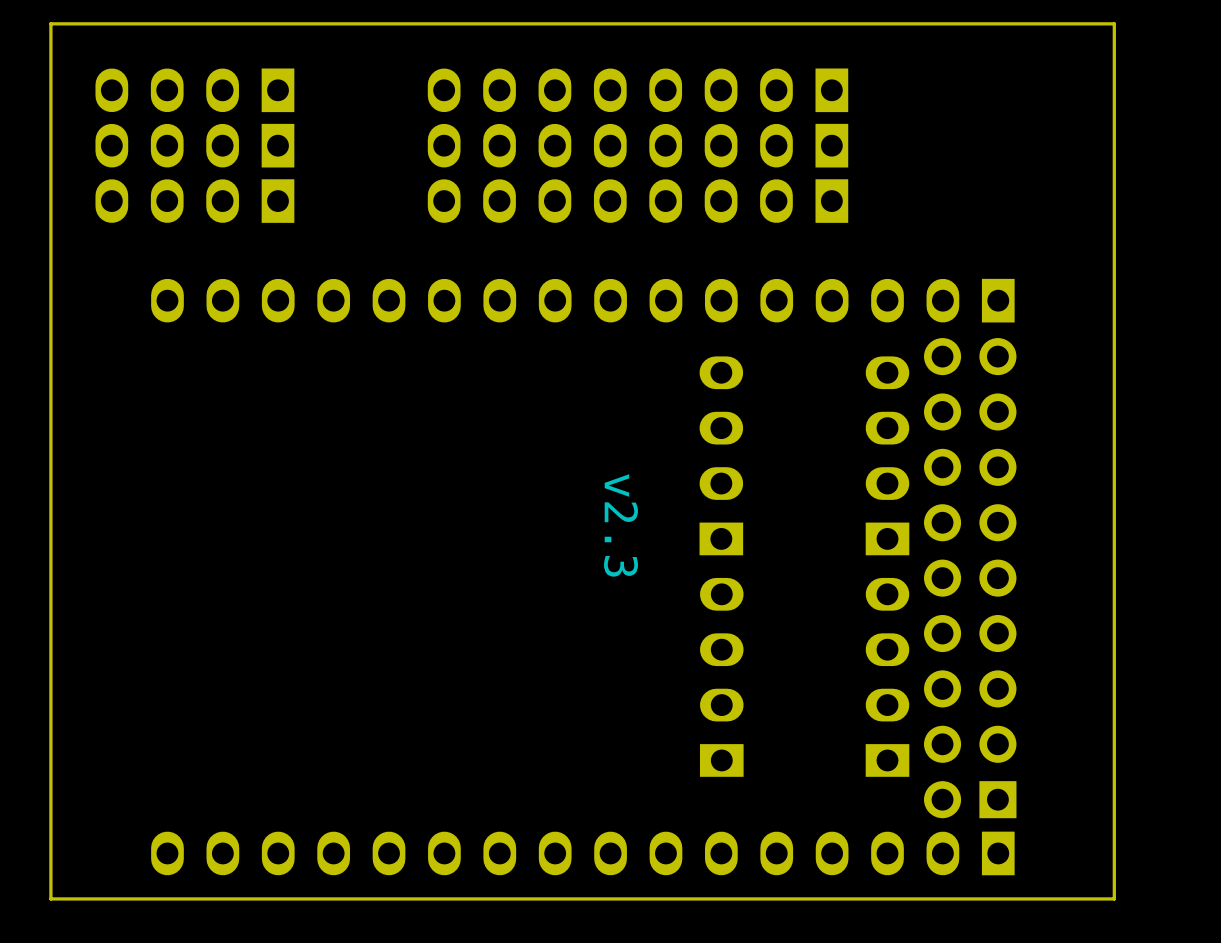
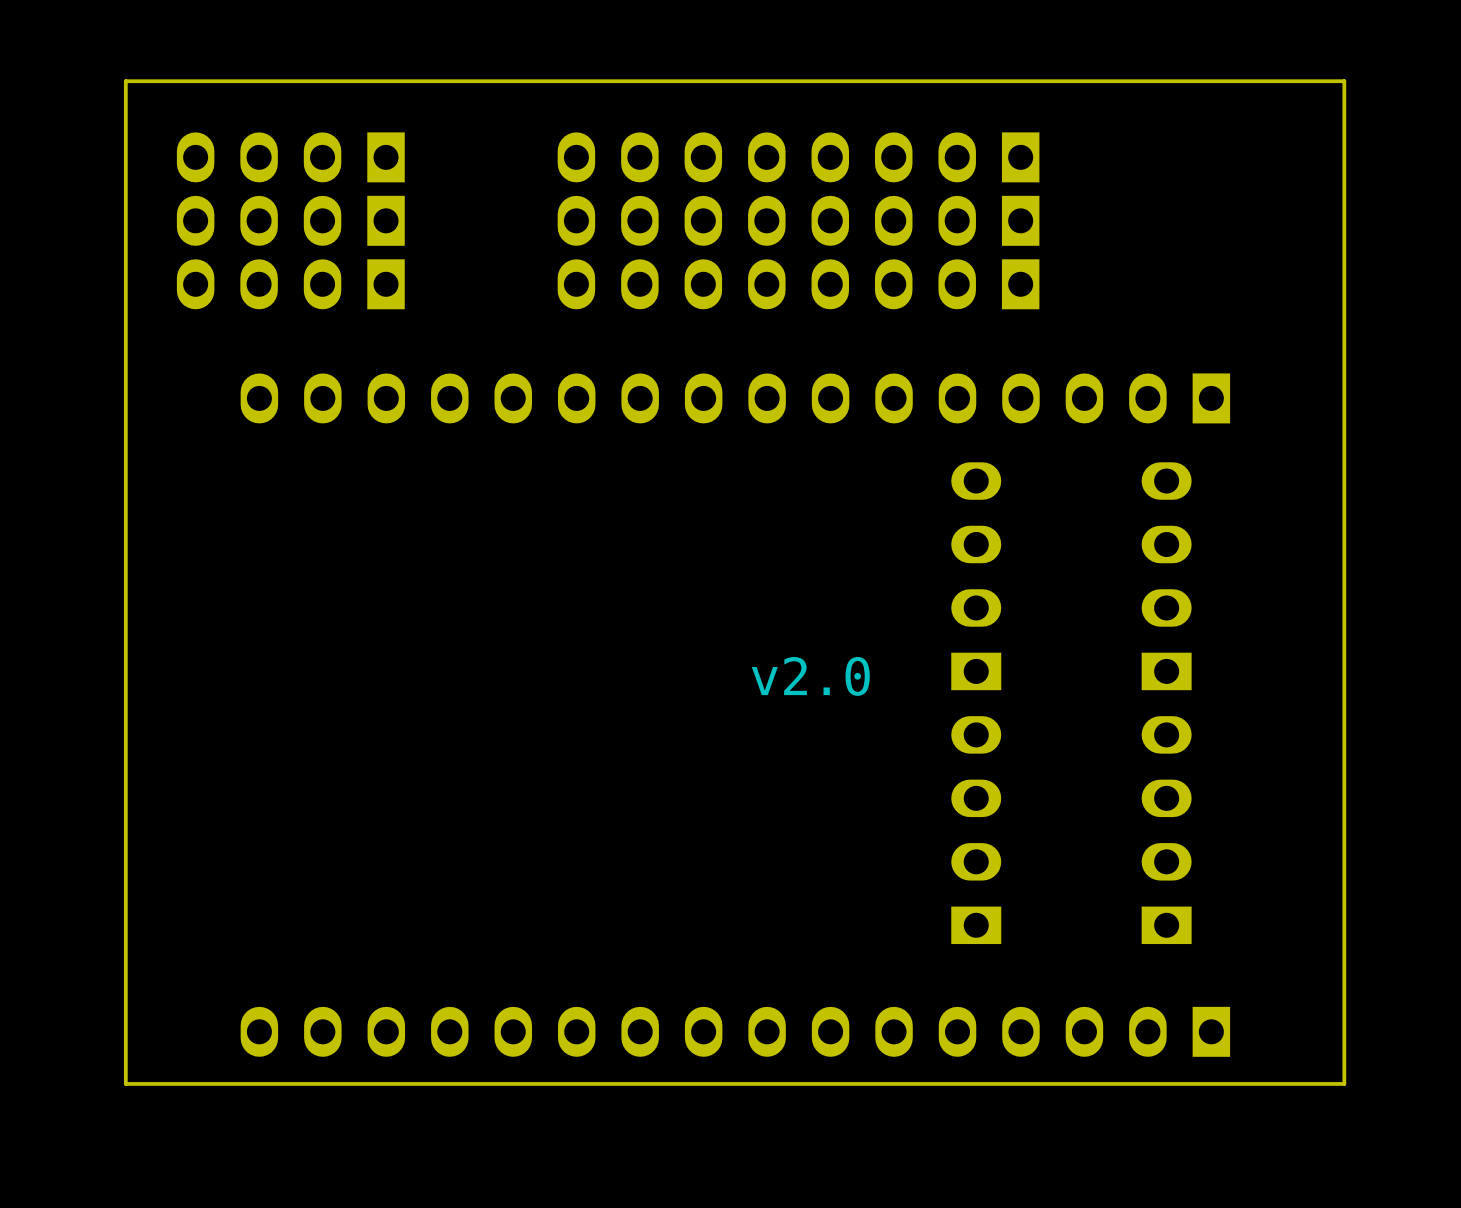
part: (721, 455) -> none
part: none -> (976, 576)
part: (887, 455) -> none
part: none -> (1166, 576)
text: v2.3 (621, 525) -> v2.0 (810, 676)
part: (970, 578) -> none
part: (721, 677) -> none
part: none -> (976, 830)
part: (887, 677) -> none
part: none -> (1166, 830)

